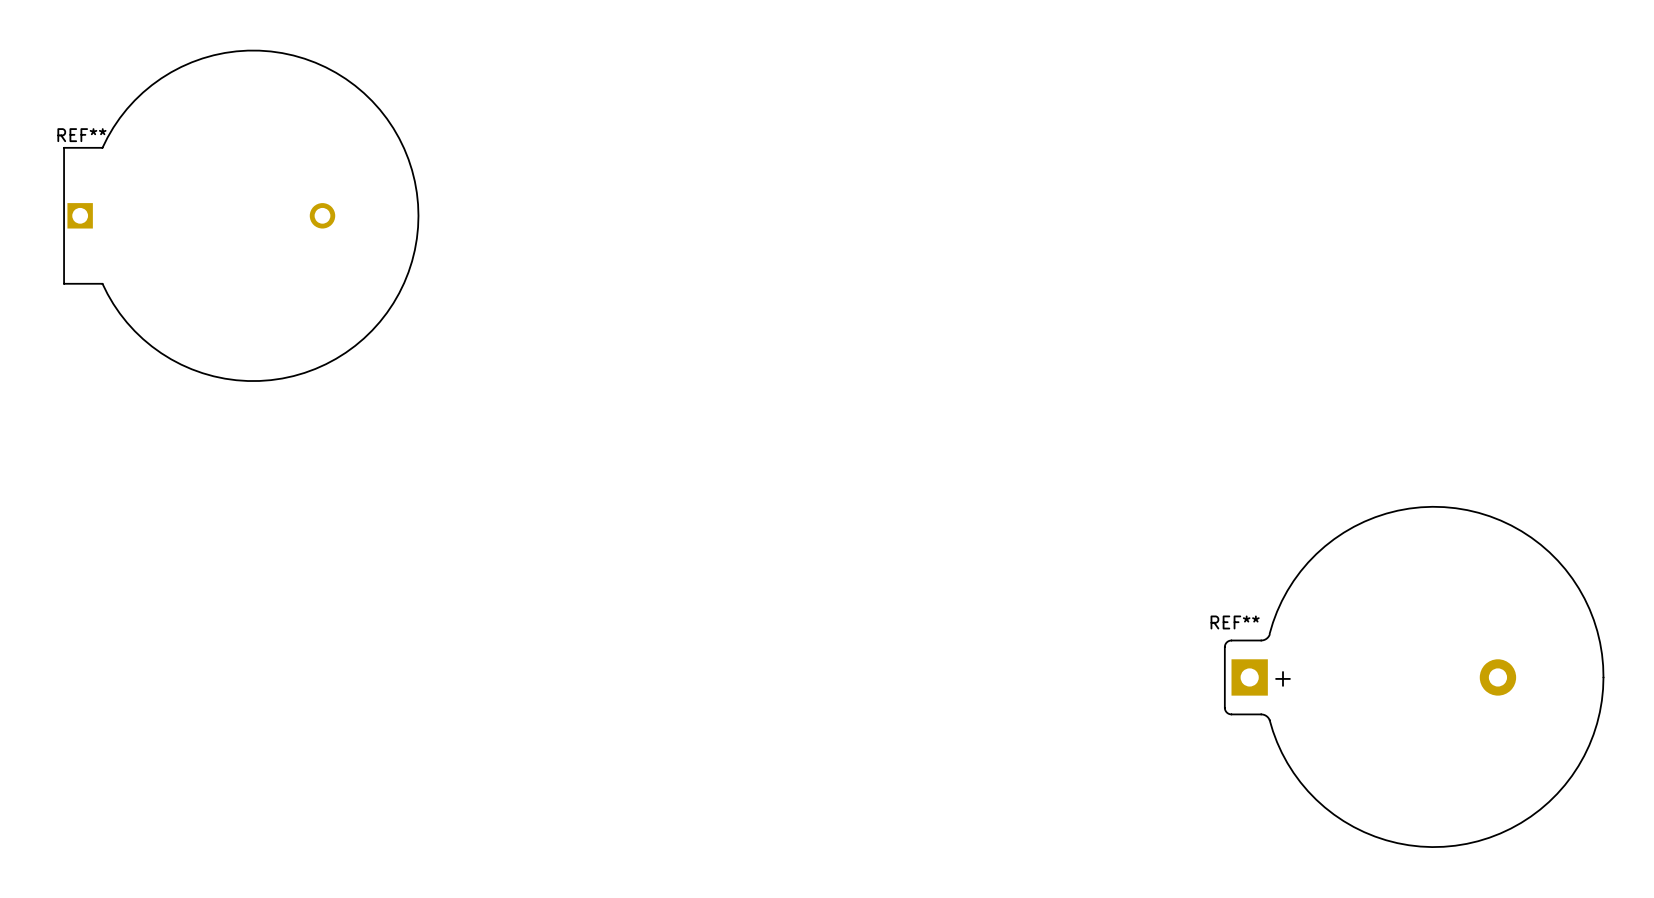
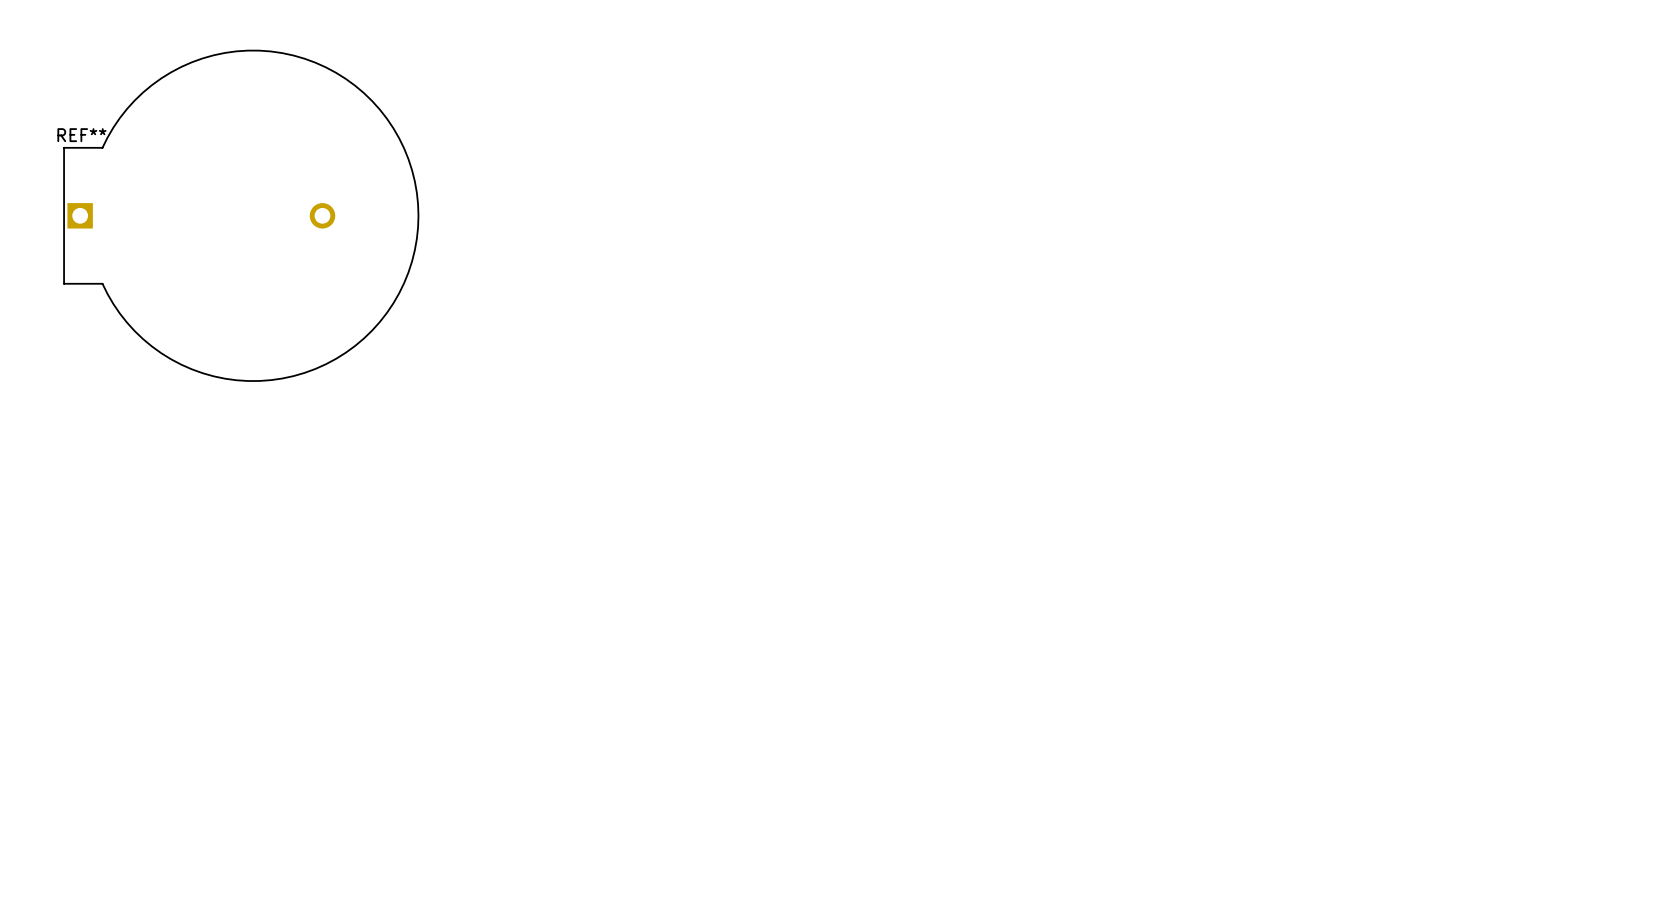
REF**: (1414, 676) -> none

